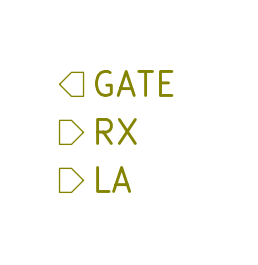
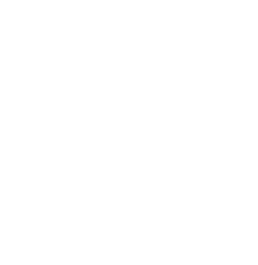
hierarchical label: GATE (134, 83) -> none
hierarchical label: RX (116, 131) -> none
hierarchical label: LA (113, 179) -> none

